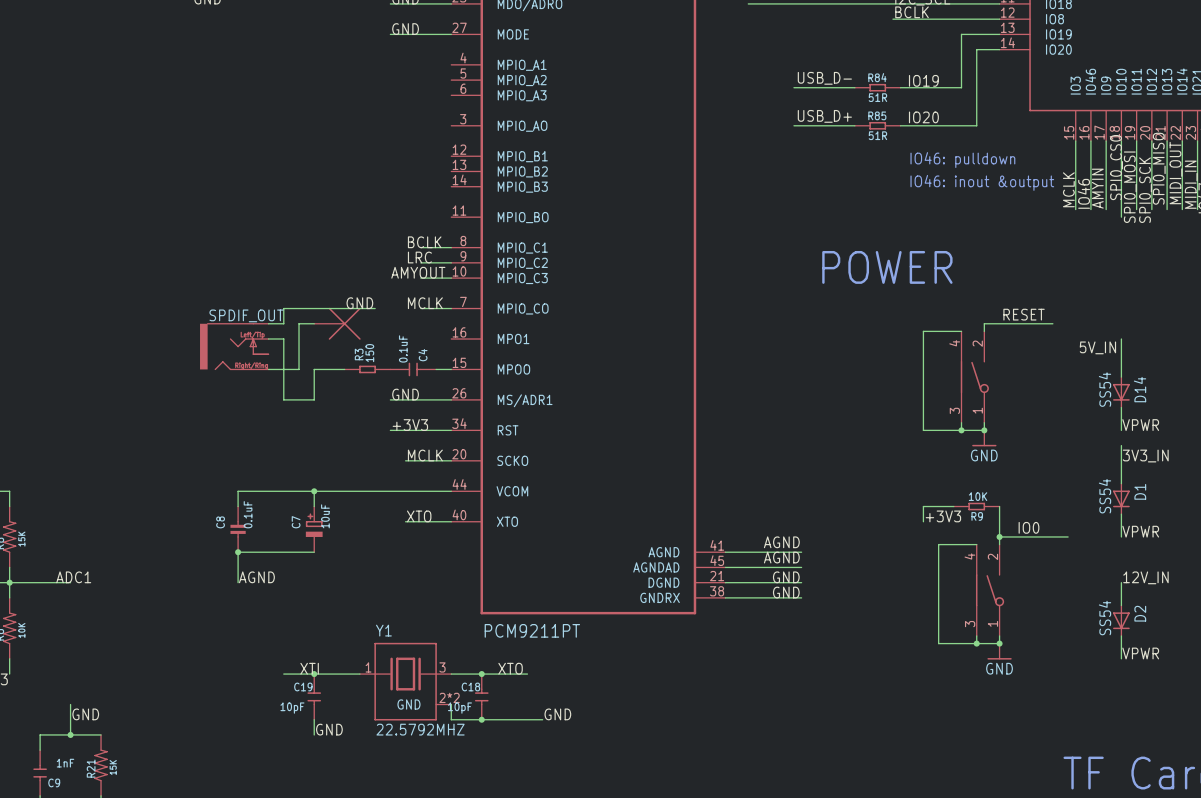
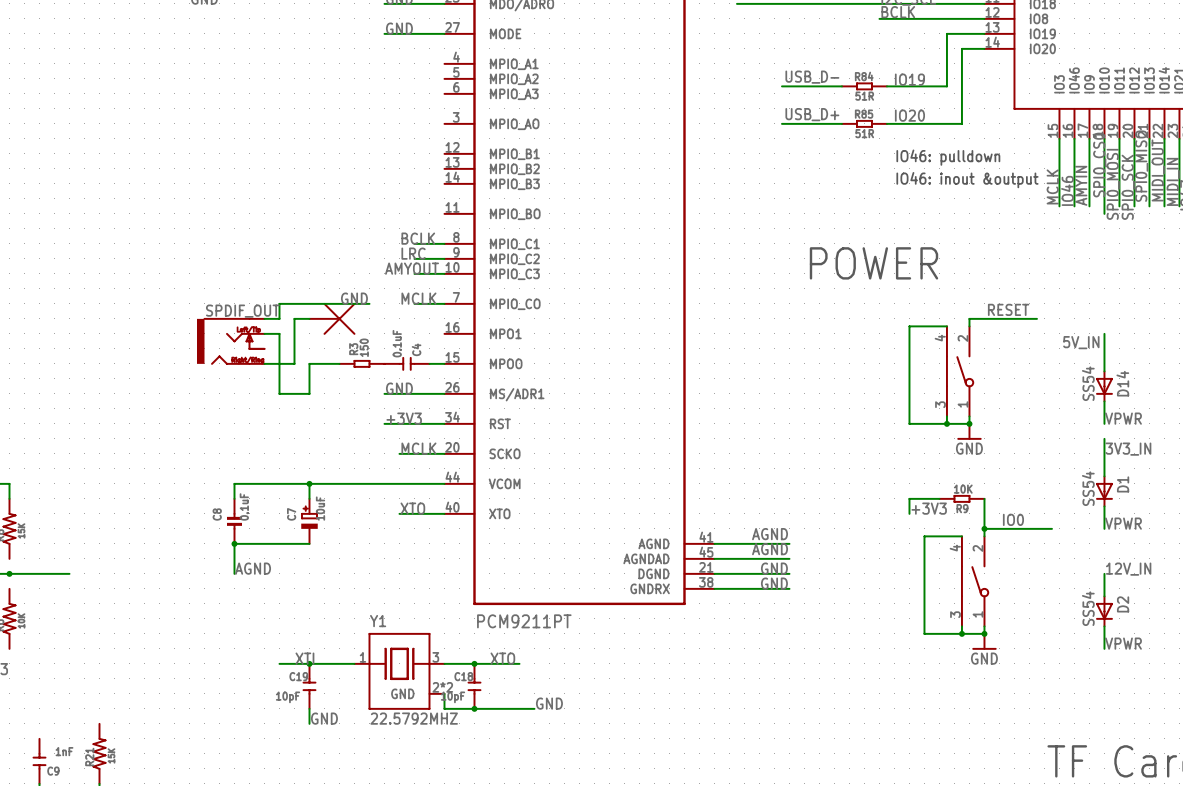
wire: (9, 567) (9, 597) -> none
label: ADC1 (73, 577) -> none
wire: (9, 658) (9, 674) -> none
wire: (70, 704) (70, 734) -> none
label: GND (85, 714) -> none
junction: (70, 734) -> none
wire: (101, 734) (40, 734) (40, 750) -> none

